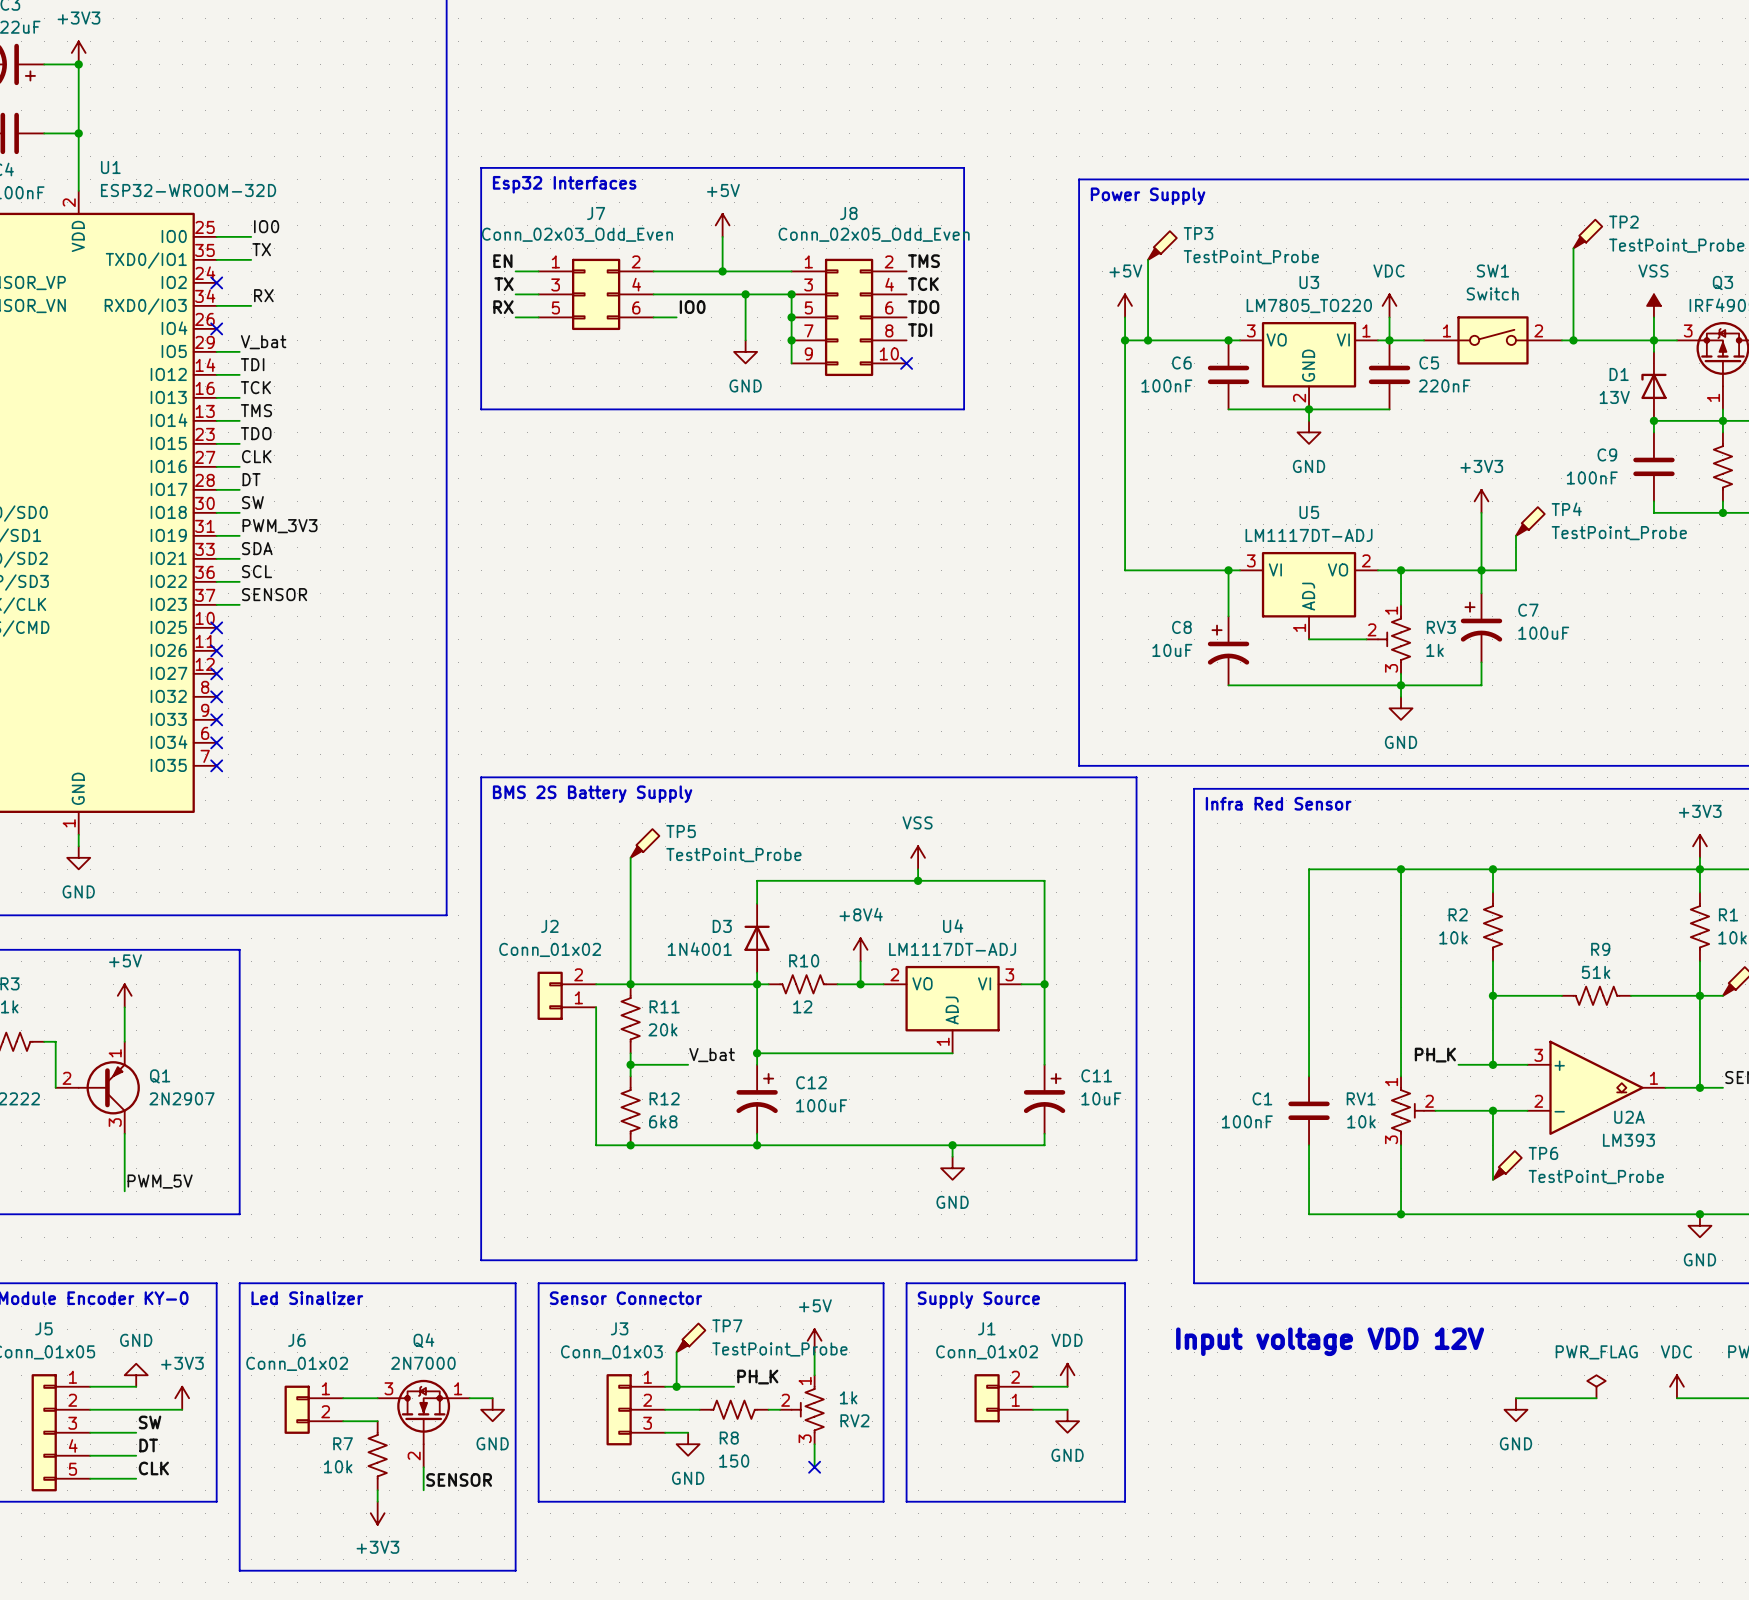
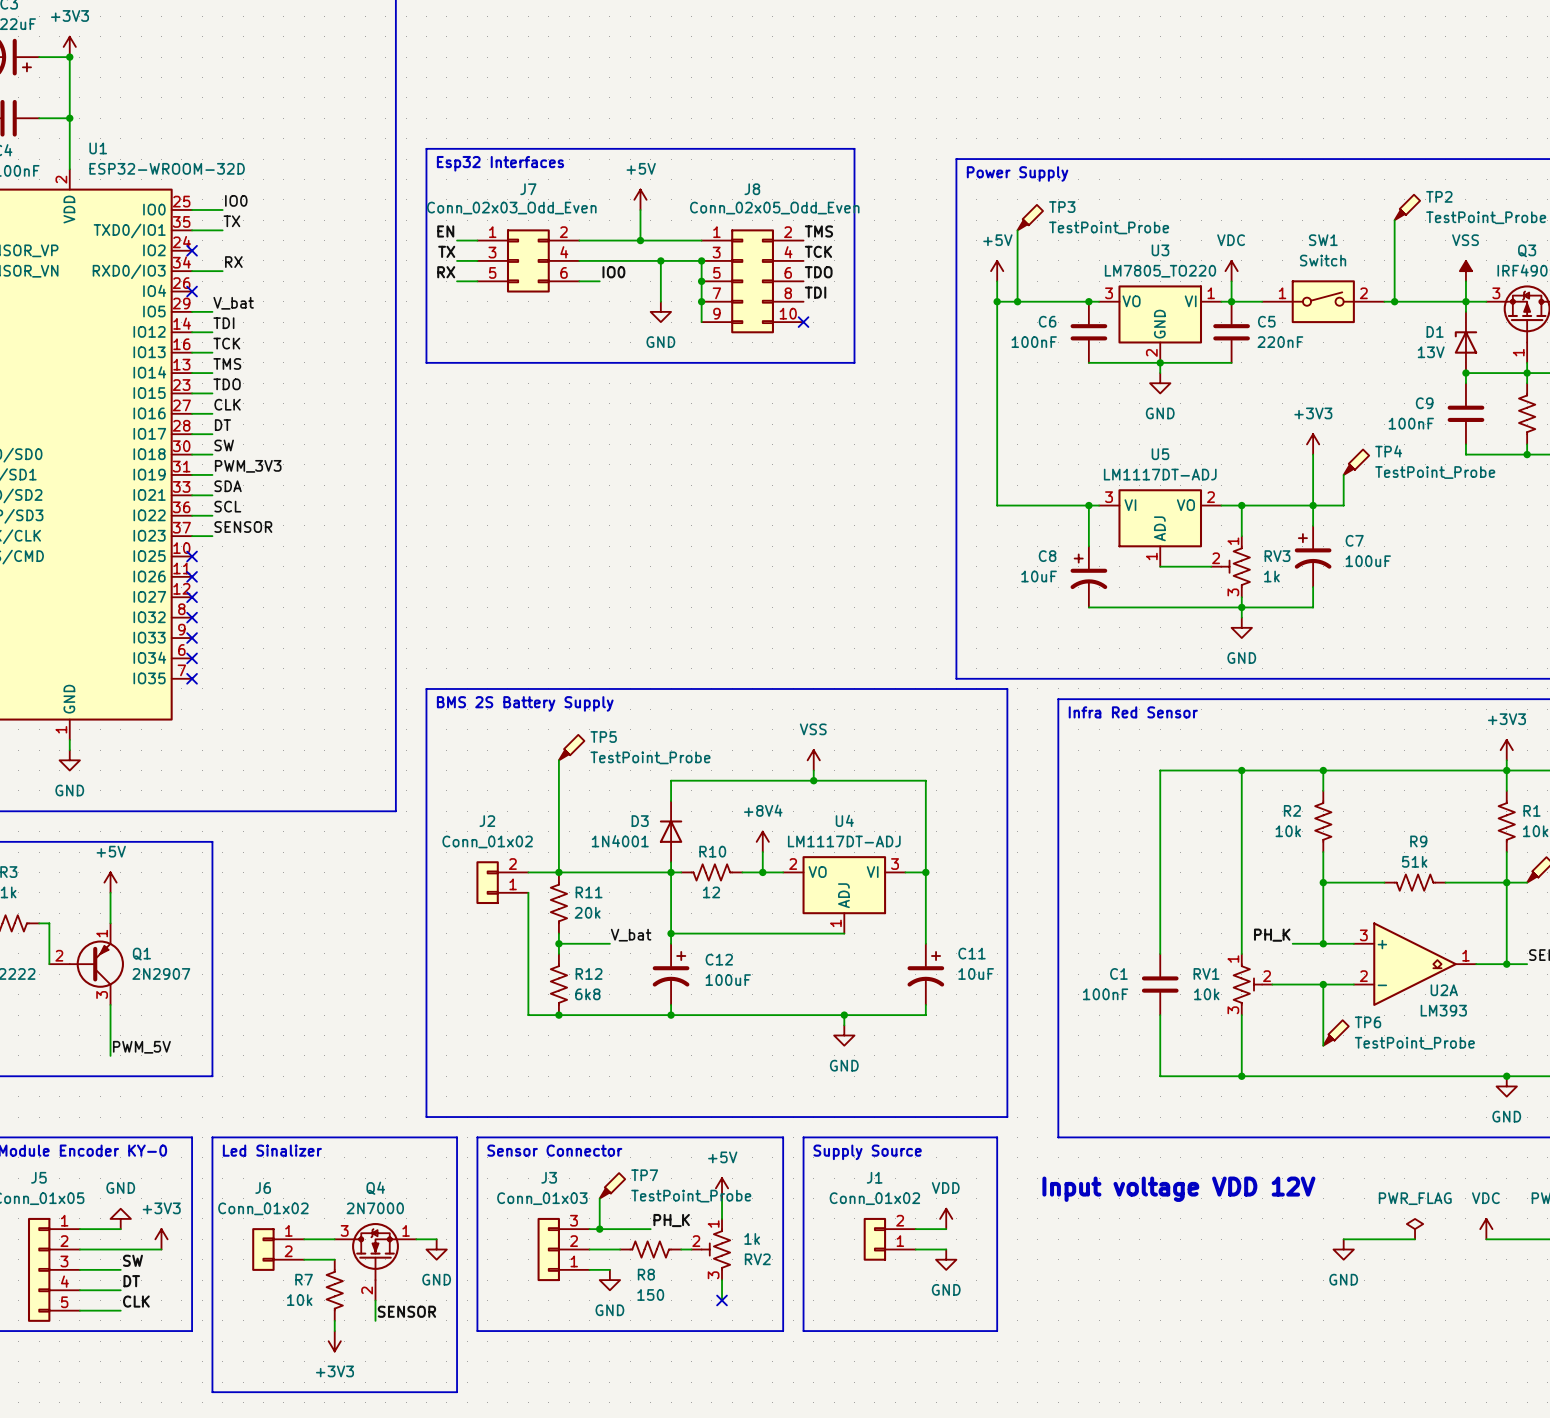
J3 flip: as is (619, 1409) -> up-down (548, 1249)

